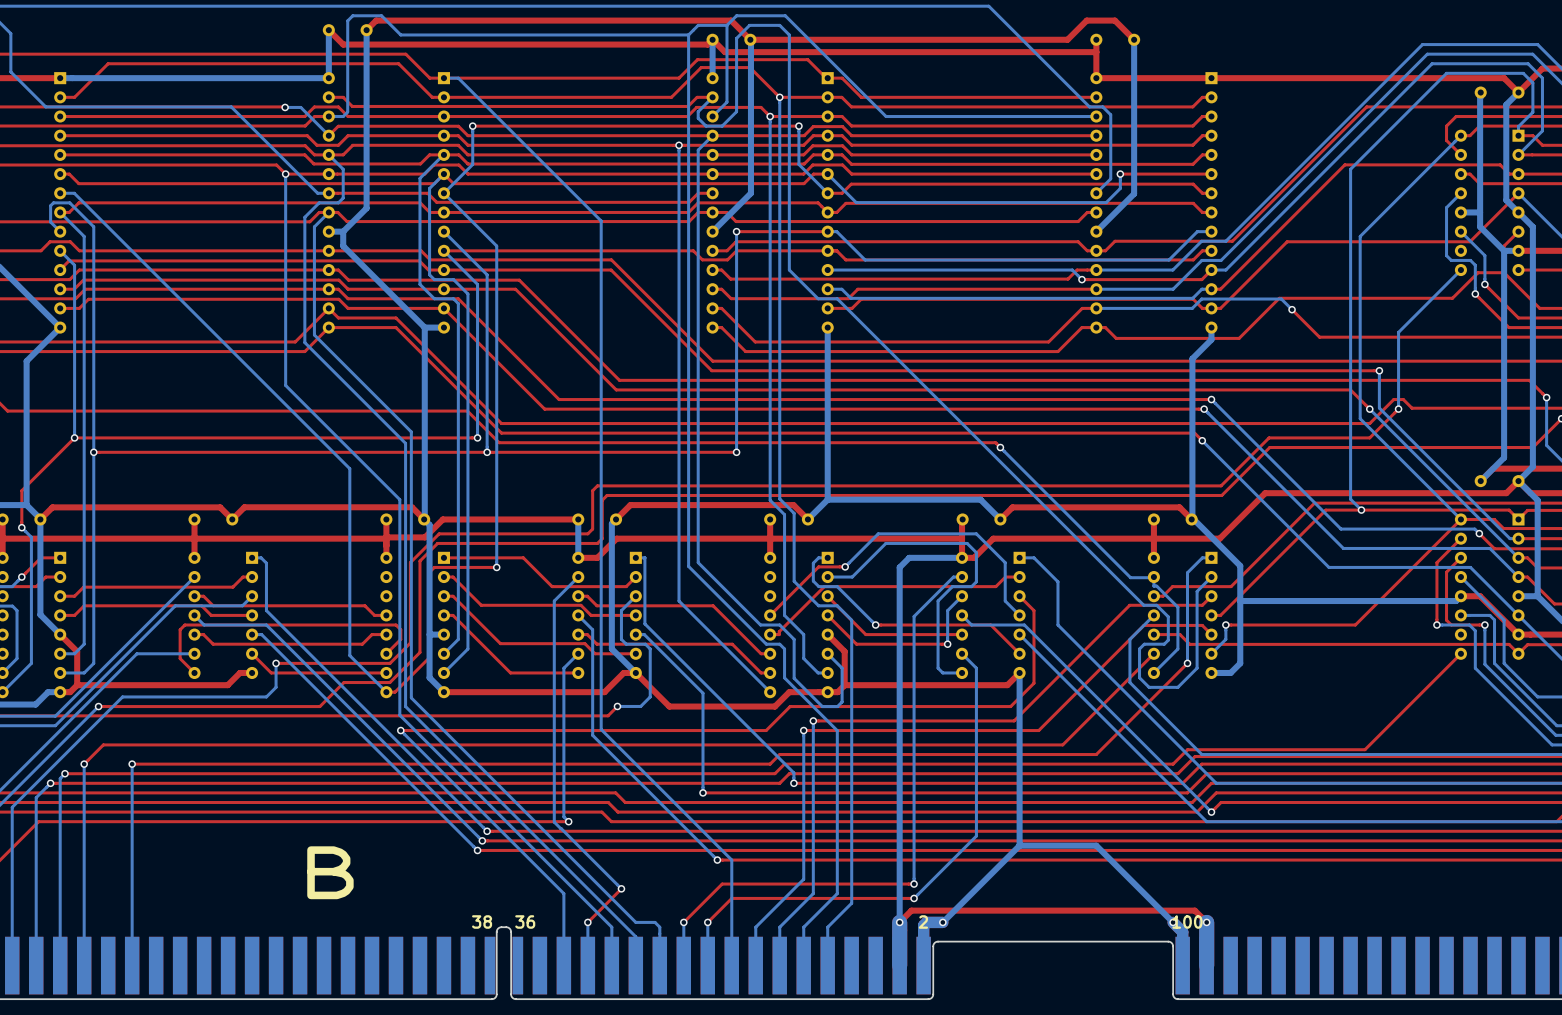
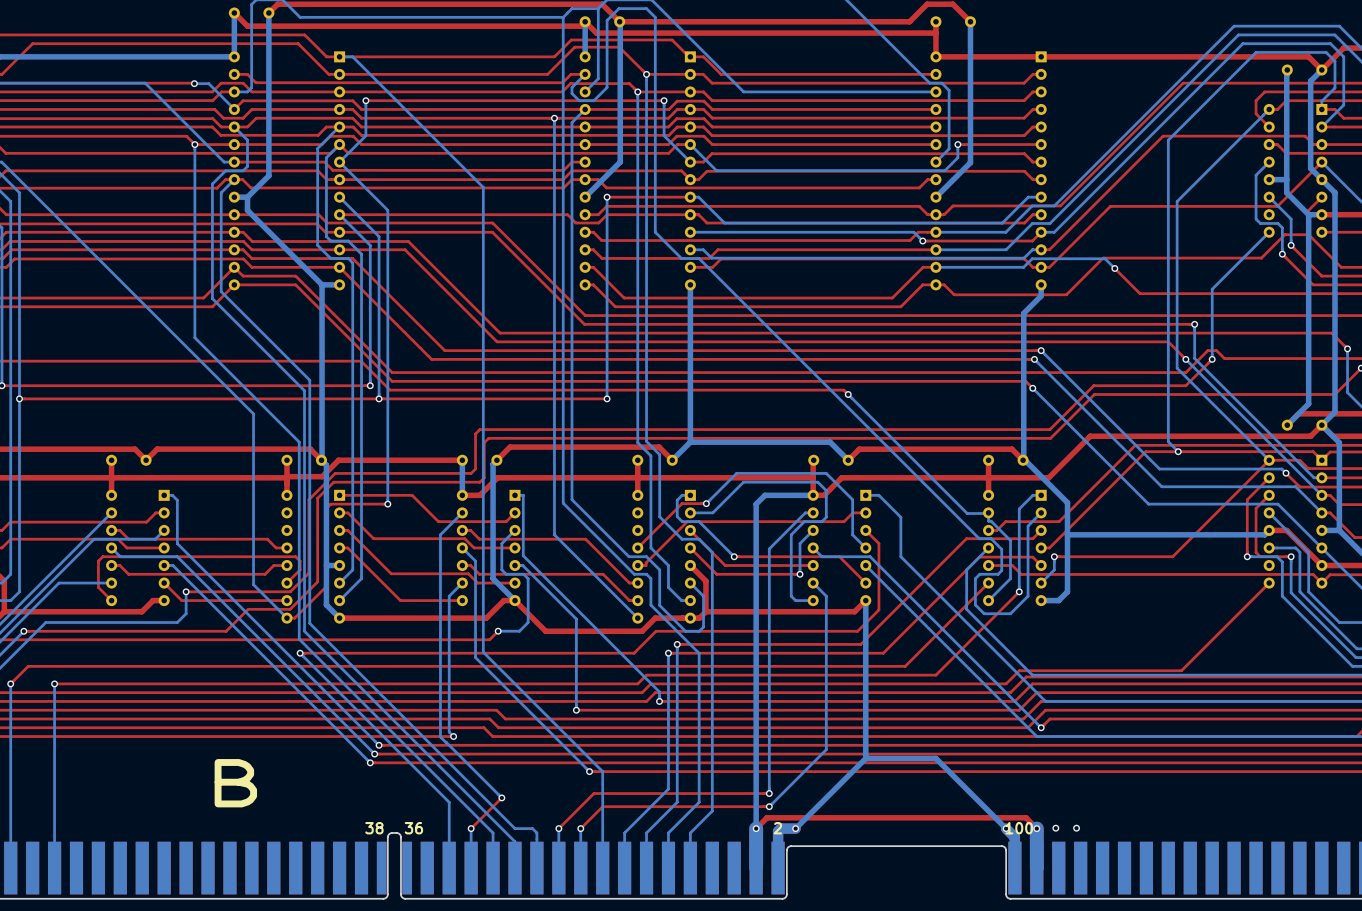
via: none -> (1055, 828)
via: none -> (1076, 828)

